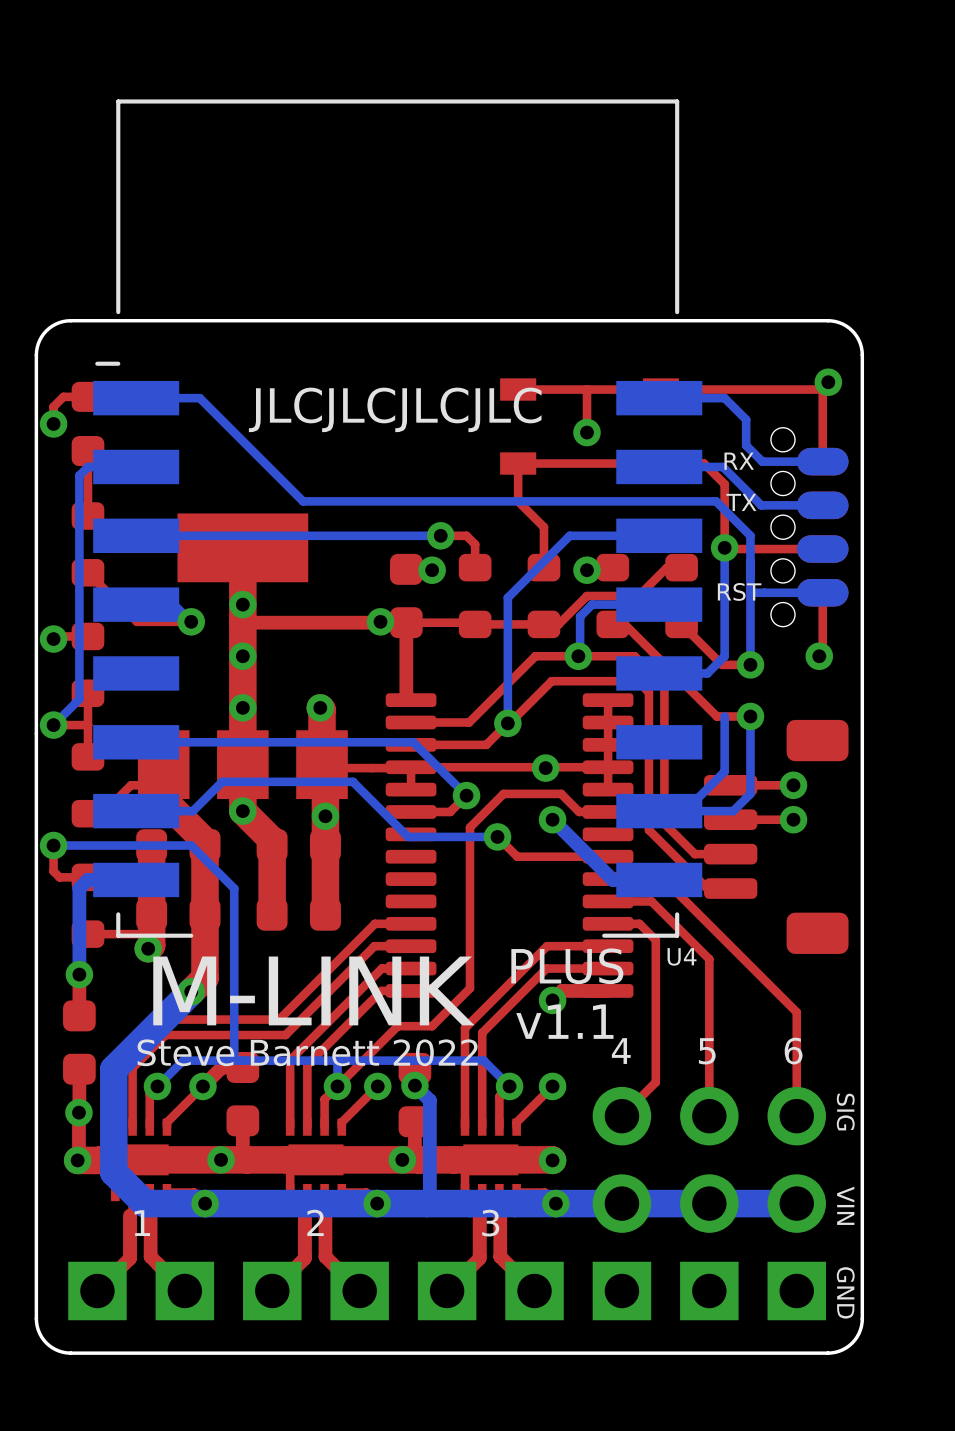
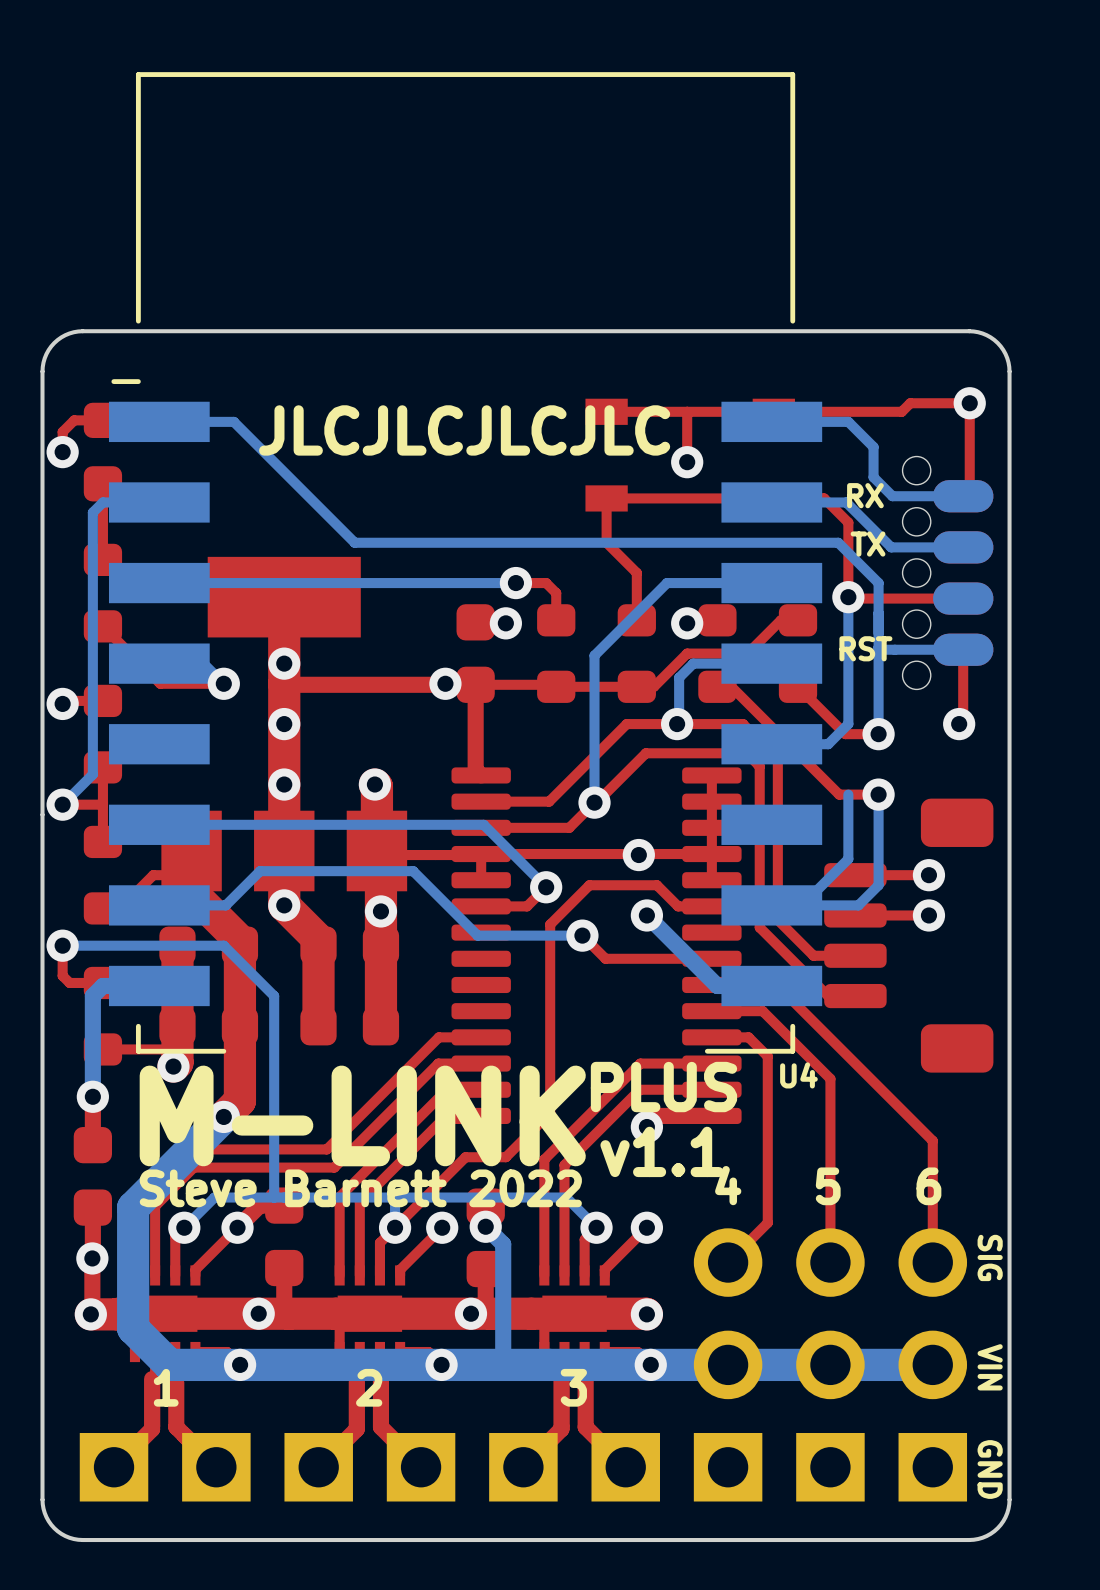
top track: (828, 382) (821, 389) (770, 389) -> none
top track: (822, 387) (822, 461) -> (901, 411) (910, 403) (969, 403) (969, 489) (963, 496)

